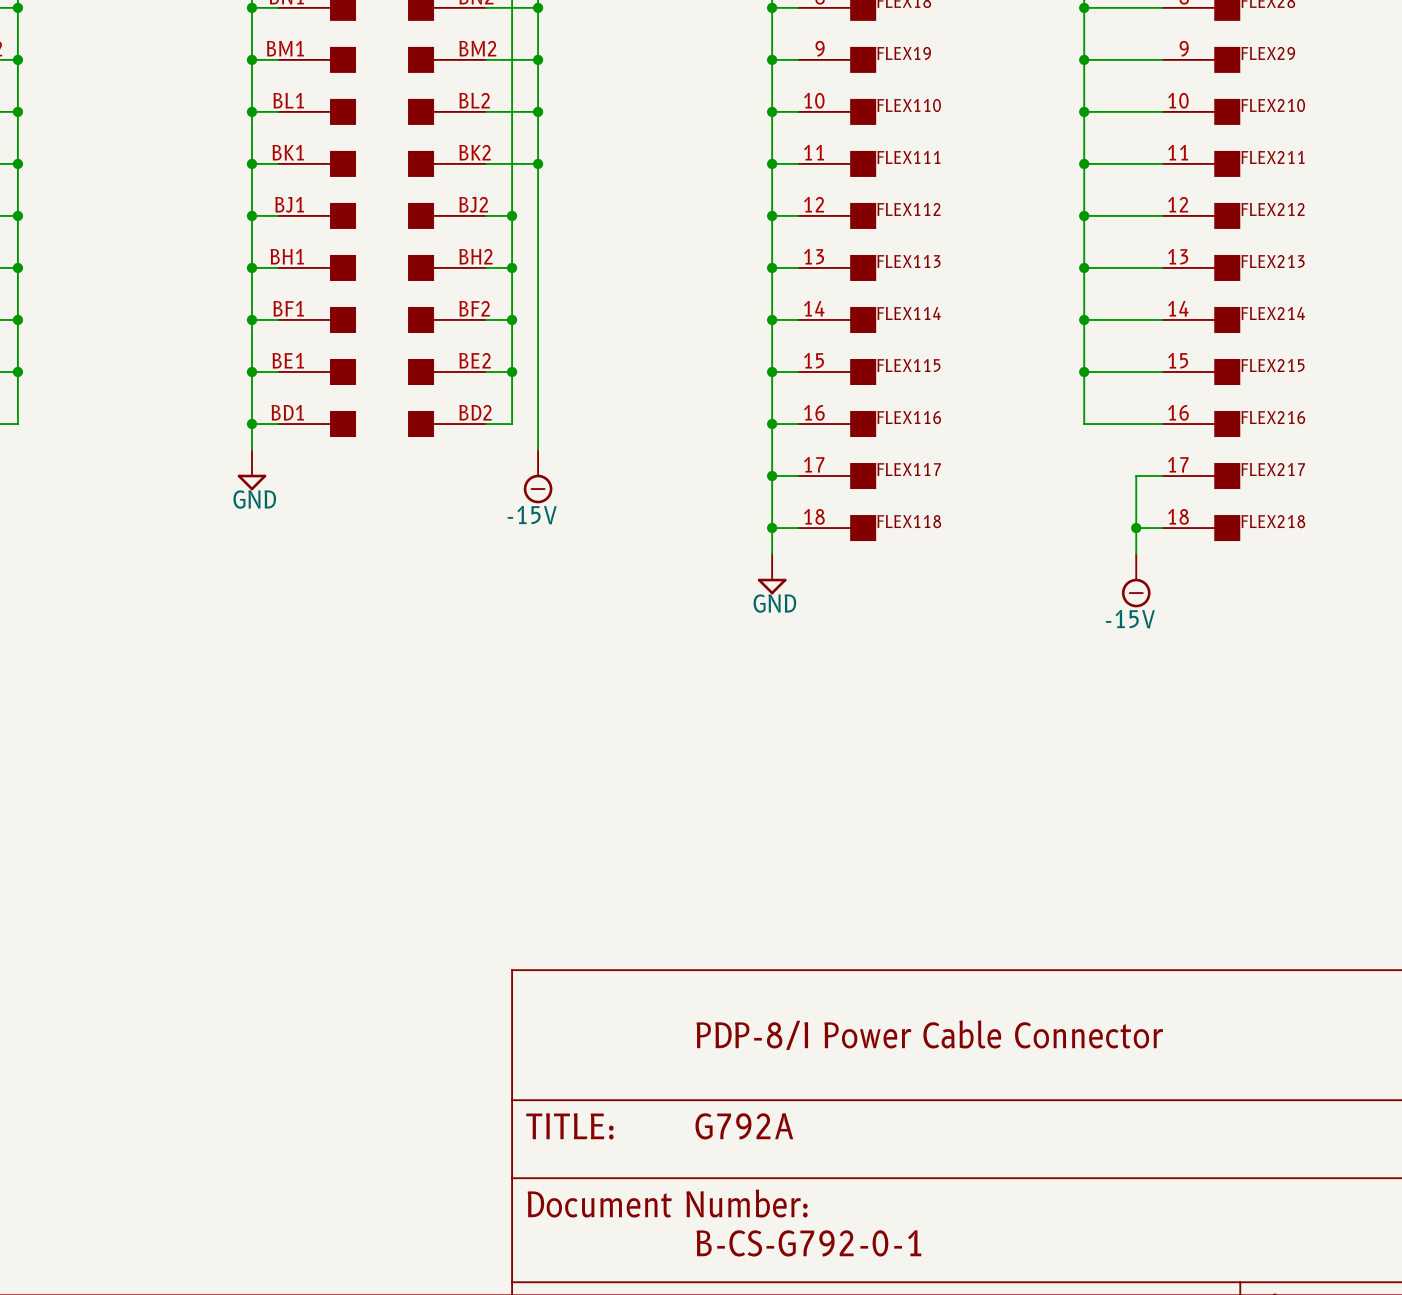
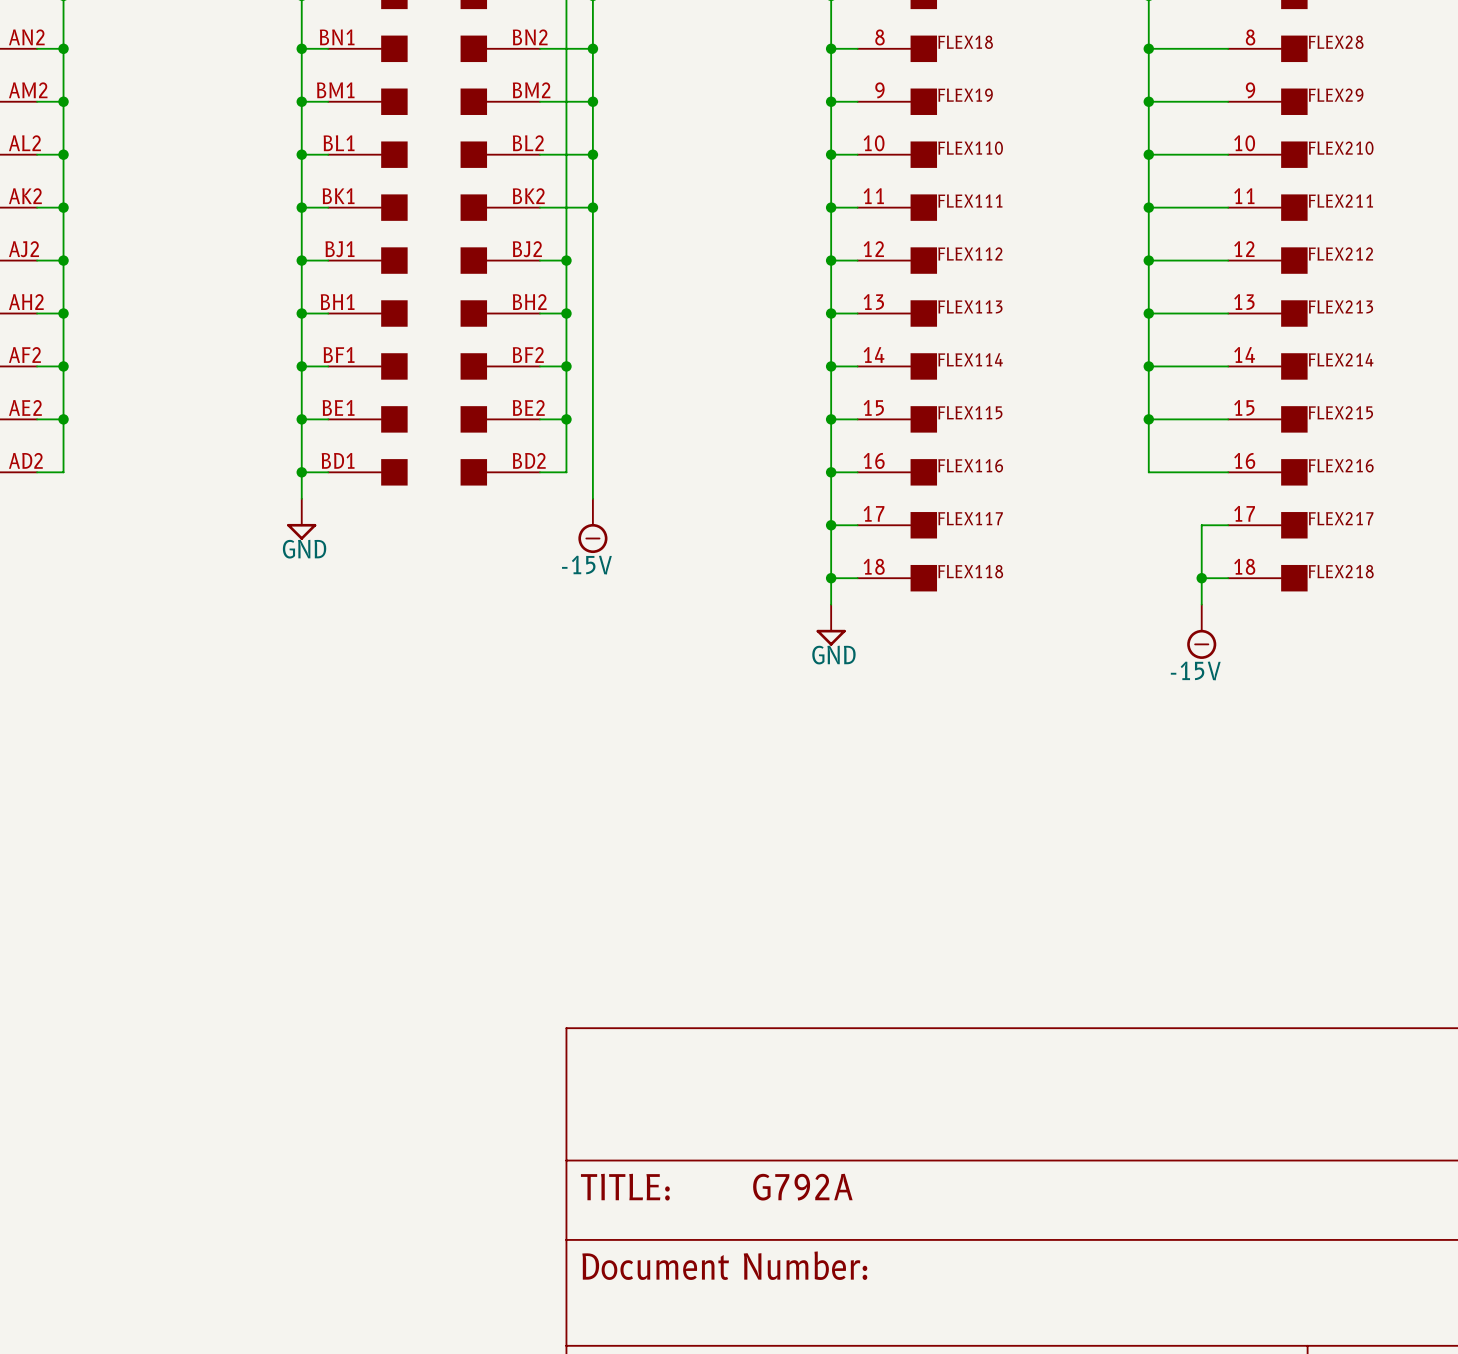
text: PDP-8/I Power Cable Connector (929, 1035) -> none
text: B-CS-G792-0-1 (808, 1243) -> none

